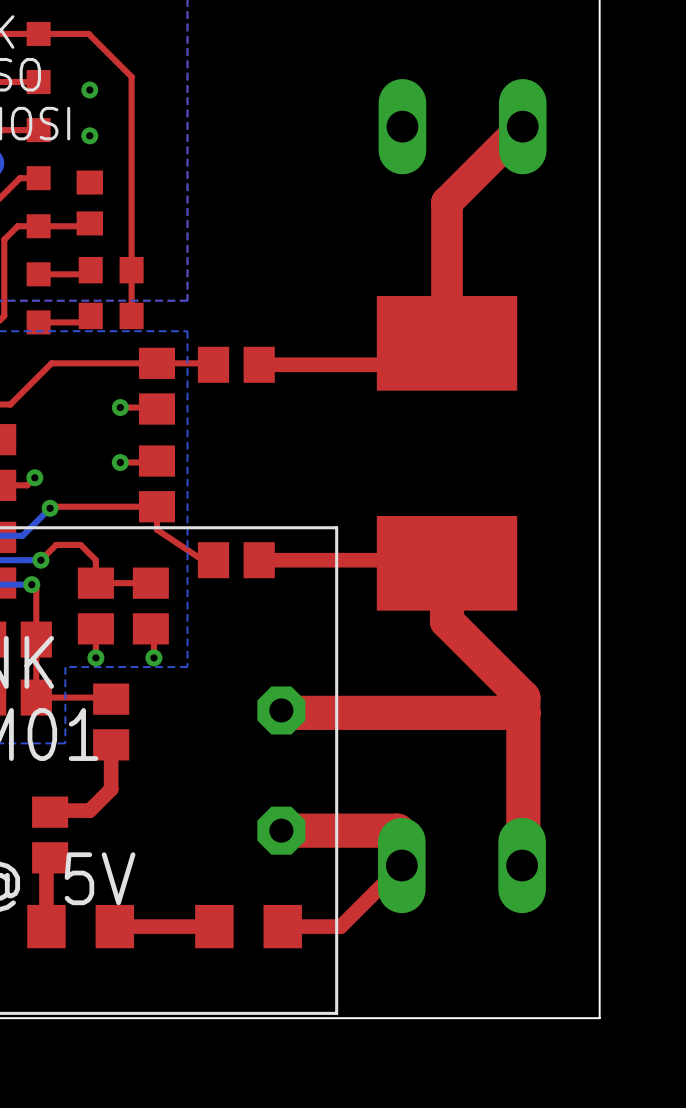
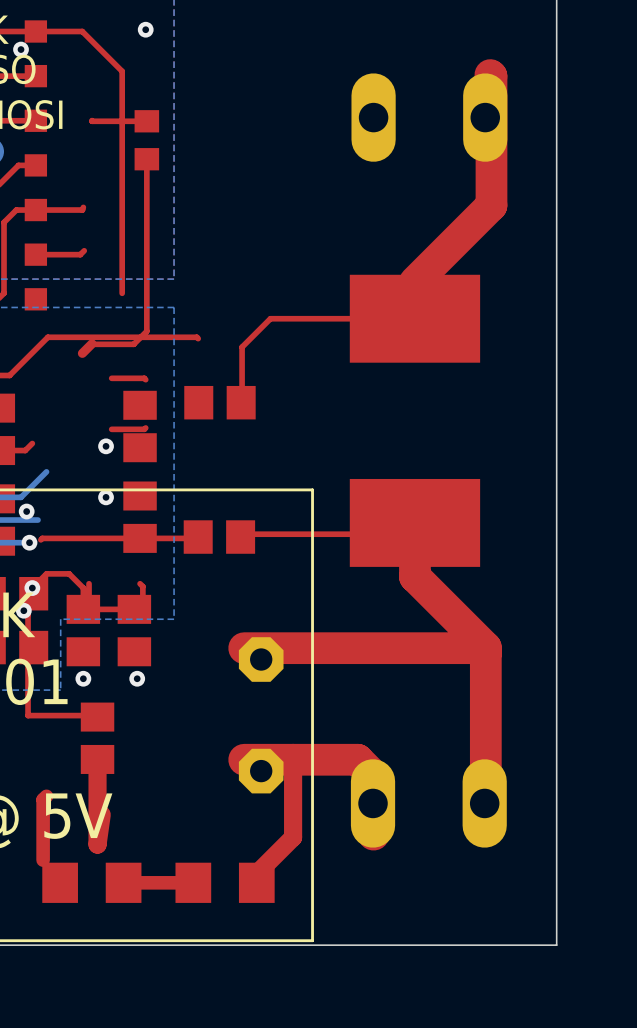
via: none -> (145, 29)
via: none -> (21, 49)
via: (89, 90) -> none
top track: (522, 126) (447, 202) (447, 303) -> (490, 75) (491, 205) (414, 281)
top track: none -> (92, 120) (146, 121)
via: (89, 135) -> none
part: none -> (146, 140)
top track: none -> (146, 159) (146, 331) (133, 344) (92, 343) (82, 353)
part: (89, 202) -> none
part: (111, 270) -> none
top track: (90, 315) (84, 322) (38, 322) -> none
part: (111, 315) -> none
top track: none -> (414, 318) (270, 318) (242, 347) (241, 402)
part: (236, 364) -> none
top track: (425, 364) (259, 364) -> none
part: (156, 386) -> none
via: (120, 407) -> none
part: none -> (219, 402)
via position: (120, 462) -> (106, 446)
via: (34, 477) -> none
part position: (156, 483) -> (140, 426)
top track: (50, 508) (51, 506) (156, 506) (156, 529) (202, 560) (213, 560) -> none
via: (50, 508) -> none
via: none -> (106, 497)
part: none -> (140, 517)
top track: (40, 560) (56, 544) (80, 544) (95, 560) (95, 583) (150, 583) -> (32, 588) (46, 573) (69, 573) (83, 588) (83, 609) (134, 609)
via position: (40, 560) -> (26, 511)
part position: (236, 560) -> (219, 537)
top track: (443, 560) (259, 560) -> none
top track: none -> (414, 522) (403, 534) (243, 534) (240, 537)
top track: none -> (198, 537) (40, 539)
top track: (31, 584) (36, 589) (36, 697) (109, 697) (111, 699) -> (23, 610) (28, 614) (28, 715) (97, 717)
part: (95, 606) -> none
part: (150, 606) -> none
via: none -> (32, 588)
via: none -> (23, 610)
via: (95, 657) -> none
via: (153, 657) -> none
part: none -> (83, 630)
part: none -> (134, 630)
top track: none -> (244, 648) (480, 648) (485, 653)
top track: (281, 710) (283, 712) (523, 712) -> none
part: (111, 722) -> none
via: none -> (83, 678)
via: none -> (137, 678)
top track: (112, 749) (111, 744) (111, 789) (89, 810) (51, 810) (50, 812) -> none
part: none -> (97, 738)
top track: none -> (244, 759) (357, 759) (373, 775) (373, 834)
top track: none -> (293, 759) (293, 837) (256, 873) (256, 882)
top track: none -> (98, 763) (97, 759) (97, 844) (101, 814)
top track: (281, 830) (397, 830) (401, 865) (340, 926) (282, 926) -> none
part: (50, 834) -> none
part position: (80, 926) -> (91, 882)
top track: (214, 926) (114, 926) -> none
part position: (248, 926) -> (225, 882)
top track: none -> (193, 882) (123, 882)

